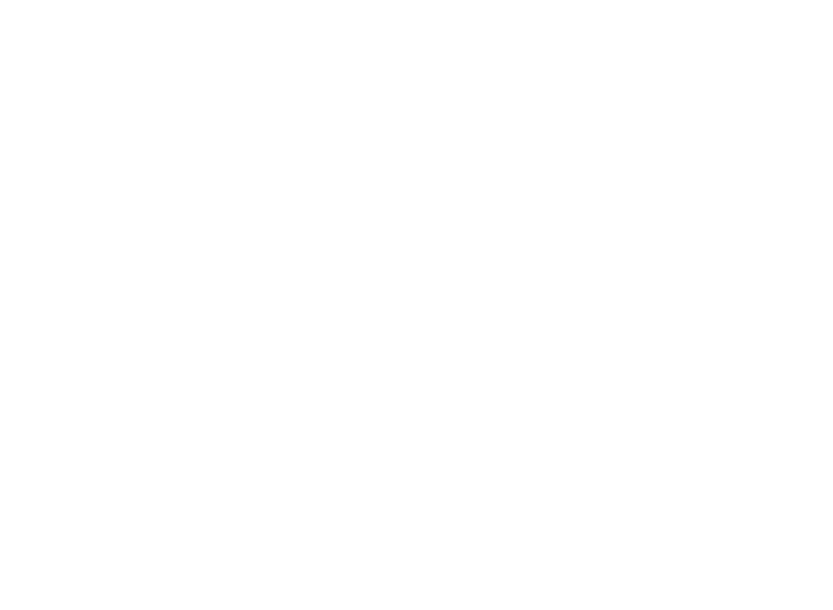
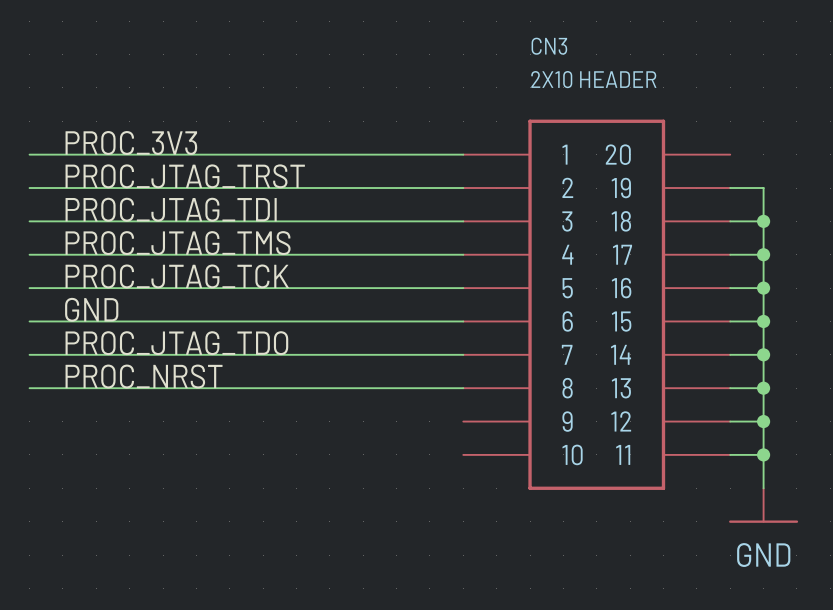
label: none -> PROC_3V3 (131, 142)
wire: none -> (29, 154) (463, 154)
label: none -> PROC_JTAG_TRST (185, 176)
wire: none -> (29, 188) (463, 188)
wire: none -> (730, 188) (763, 188) (763, 488)
label: none -> PROC_JTAG_TDI (171, 209)
wire: none -> (29, 221) (463, 221)
wire: none -> (730, 221) (763, 221)
junction: none -> (763, 221)
label: none -> PROC_JTAG_TMS (178, 243)
wire: none -> (29, 254) (463, 254)
wire: none -> (730, 254) (763, 254)
junction: none -> (763, 254)
label: none -> PROC_JTAG_TCK (177, 276)
wire: none -> (29, 288) (463, 288)
wire: none -> (730, 288) (763, 288)
junction: none -> (763, 288)
CN3: none -> 2X10 HEADER (596, 304)
label: none -> GND (91, 309)
wire: none -> (29, 321) (463, 321)
wire: none -> (730, 321) (763, 321)
junction: none -> (763, 321)
label: none -> PROC_JTAG_TDO (176, 343)
wire: none -> (29, 354) (463, 354)
wire: none -> (730, 354) (763, 354)
junction: none -> (763, 354)
label: none -> PROC_NRST (144, 376)
wire: none -> (29, 388) (463, 388)
wire: none -> (730, 388) (763, 388)
junction: none -> (763, 388)
wire: none -> (730, 421) (763, 421)
junction: none -> (763, 421)
wire: none -> (730, 454) (763, 454)
junction: none -> (763, 454)
power symbol: none -> GND (763, 505)

